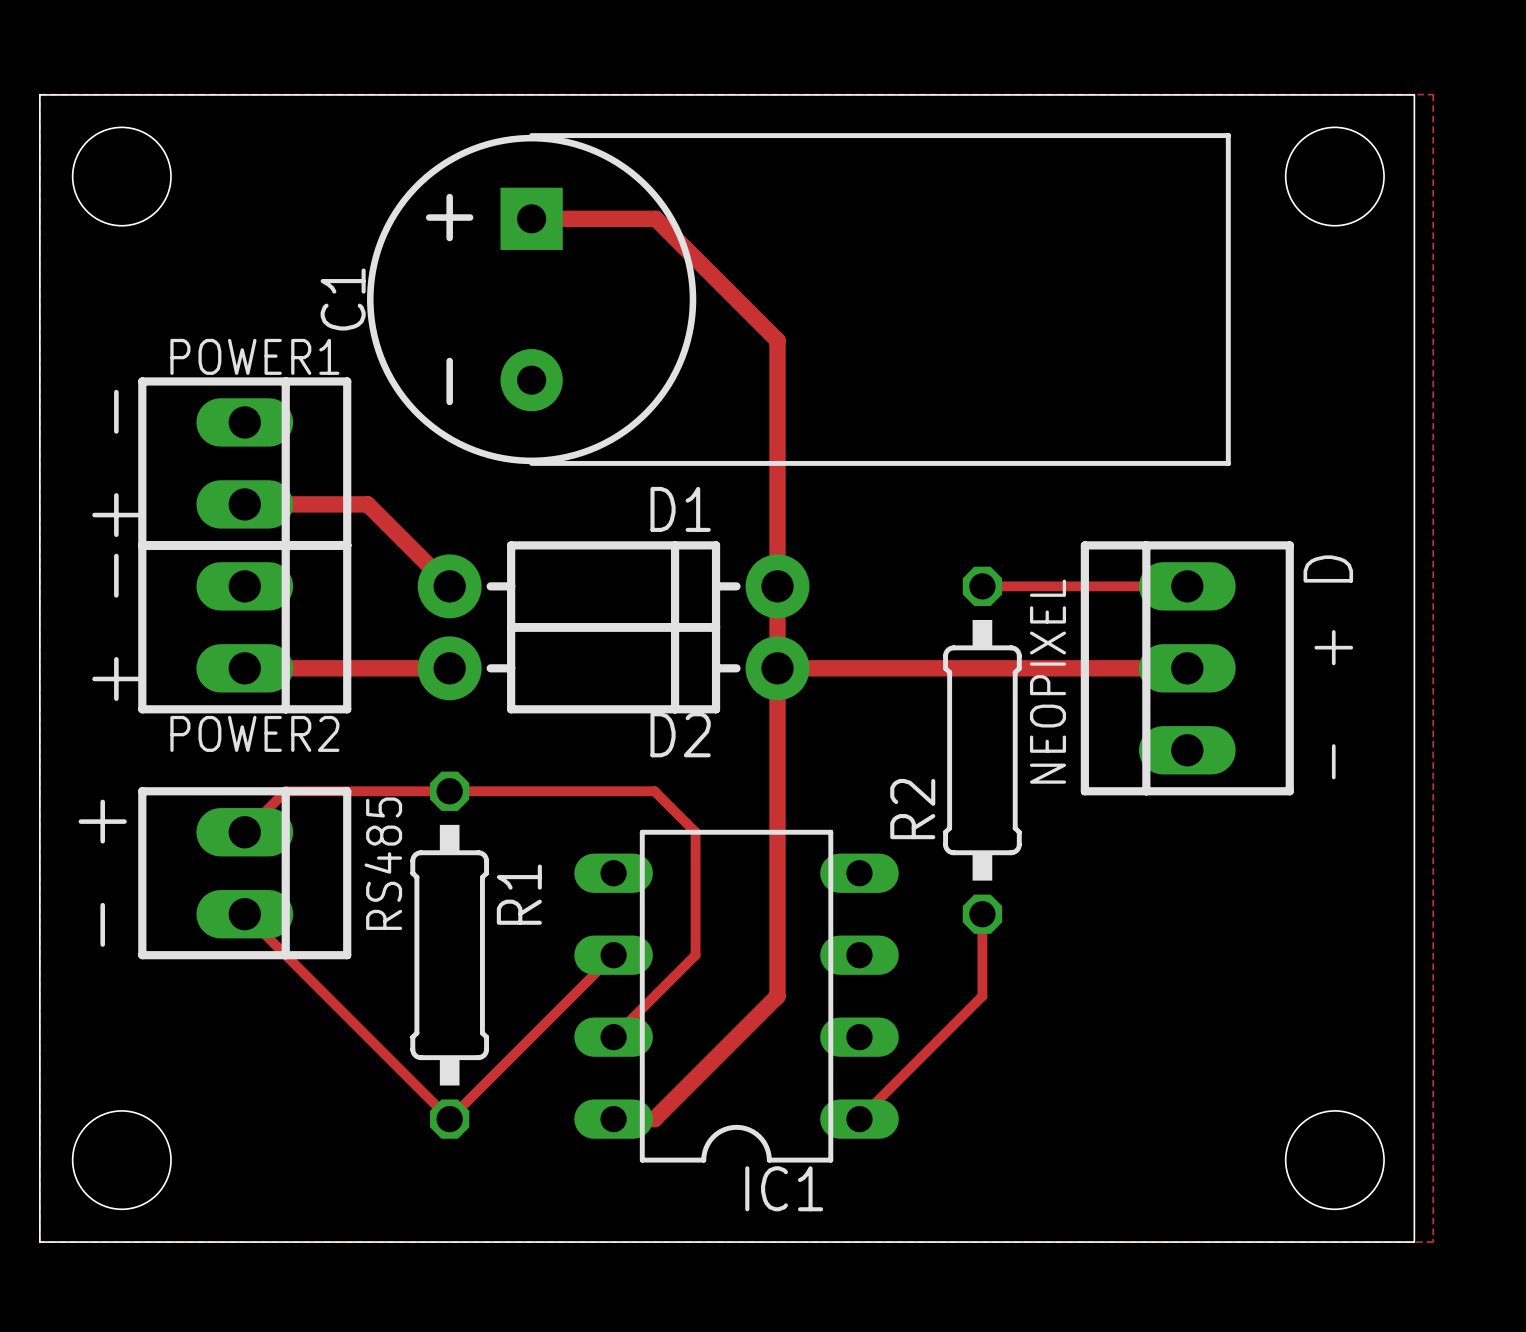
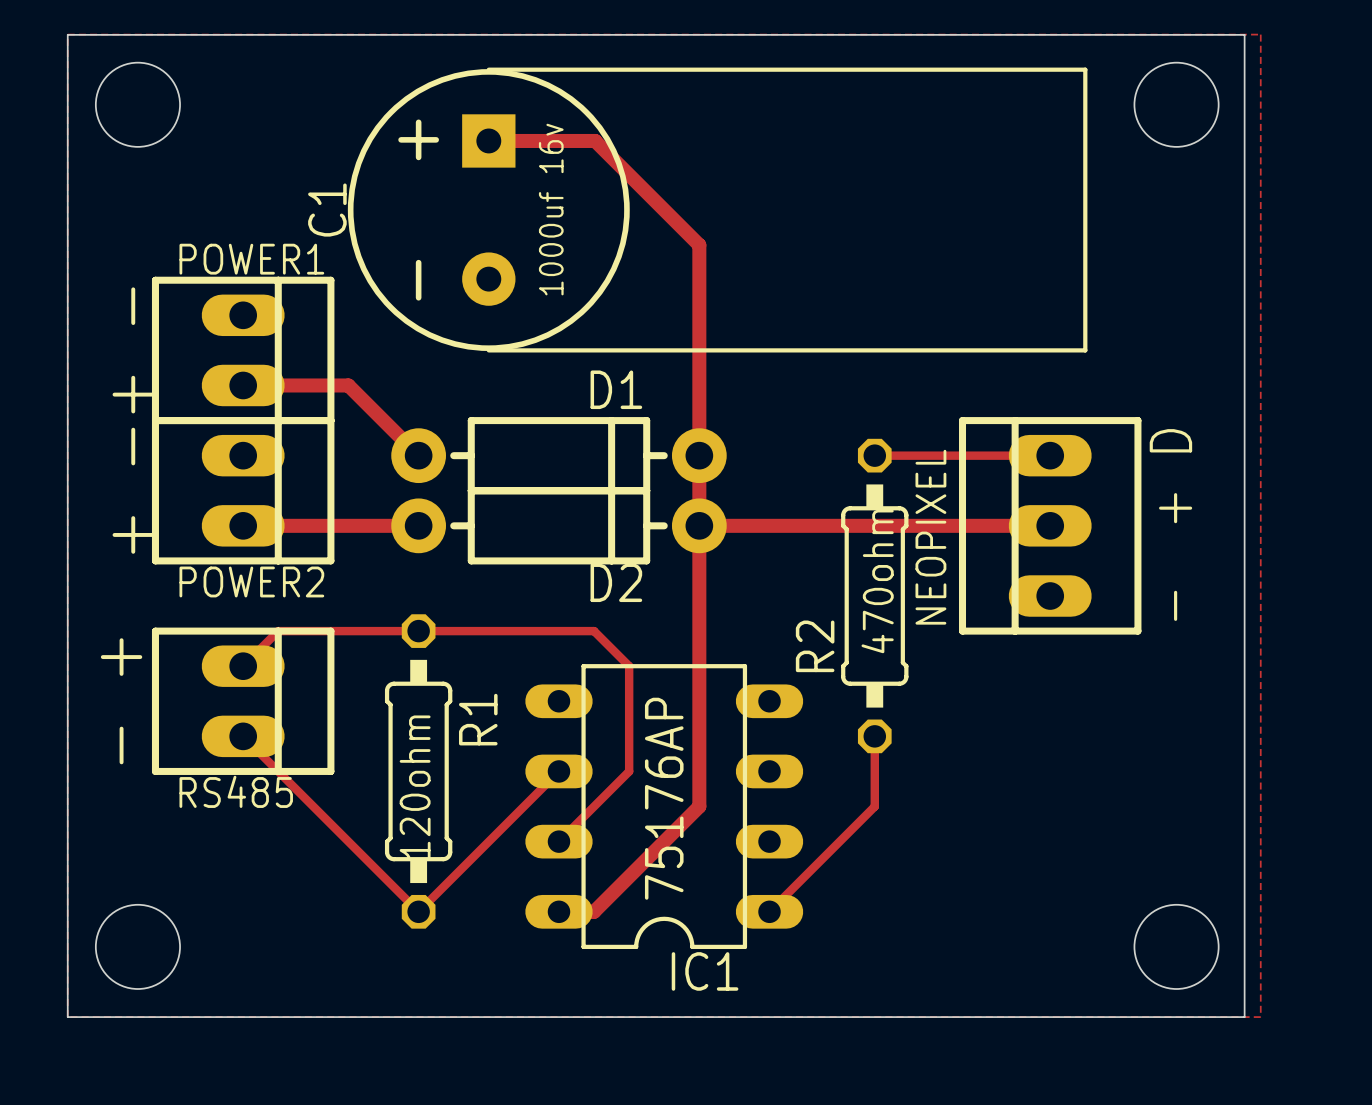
C1 value: none -> 1000uf 16v (551, 209)
R2 value: none -> 470ohm (877, 581)
RS485 name rotation: 0° (383, 863) -> 90° clockwise (236, 791)
RS485 name position: RS485 (383, 863) -> RS485 (236, 791)
R1 value: none -> 120ohm (415, 787)
IC1 value: none -> 75176AP (664, 798)

